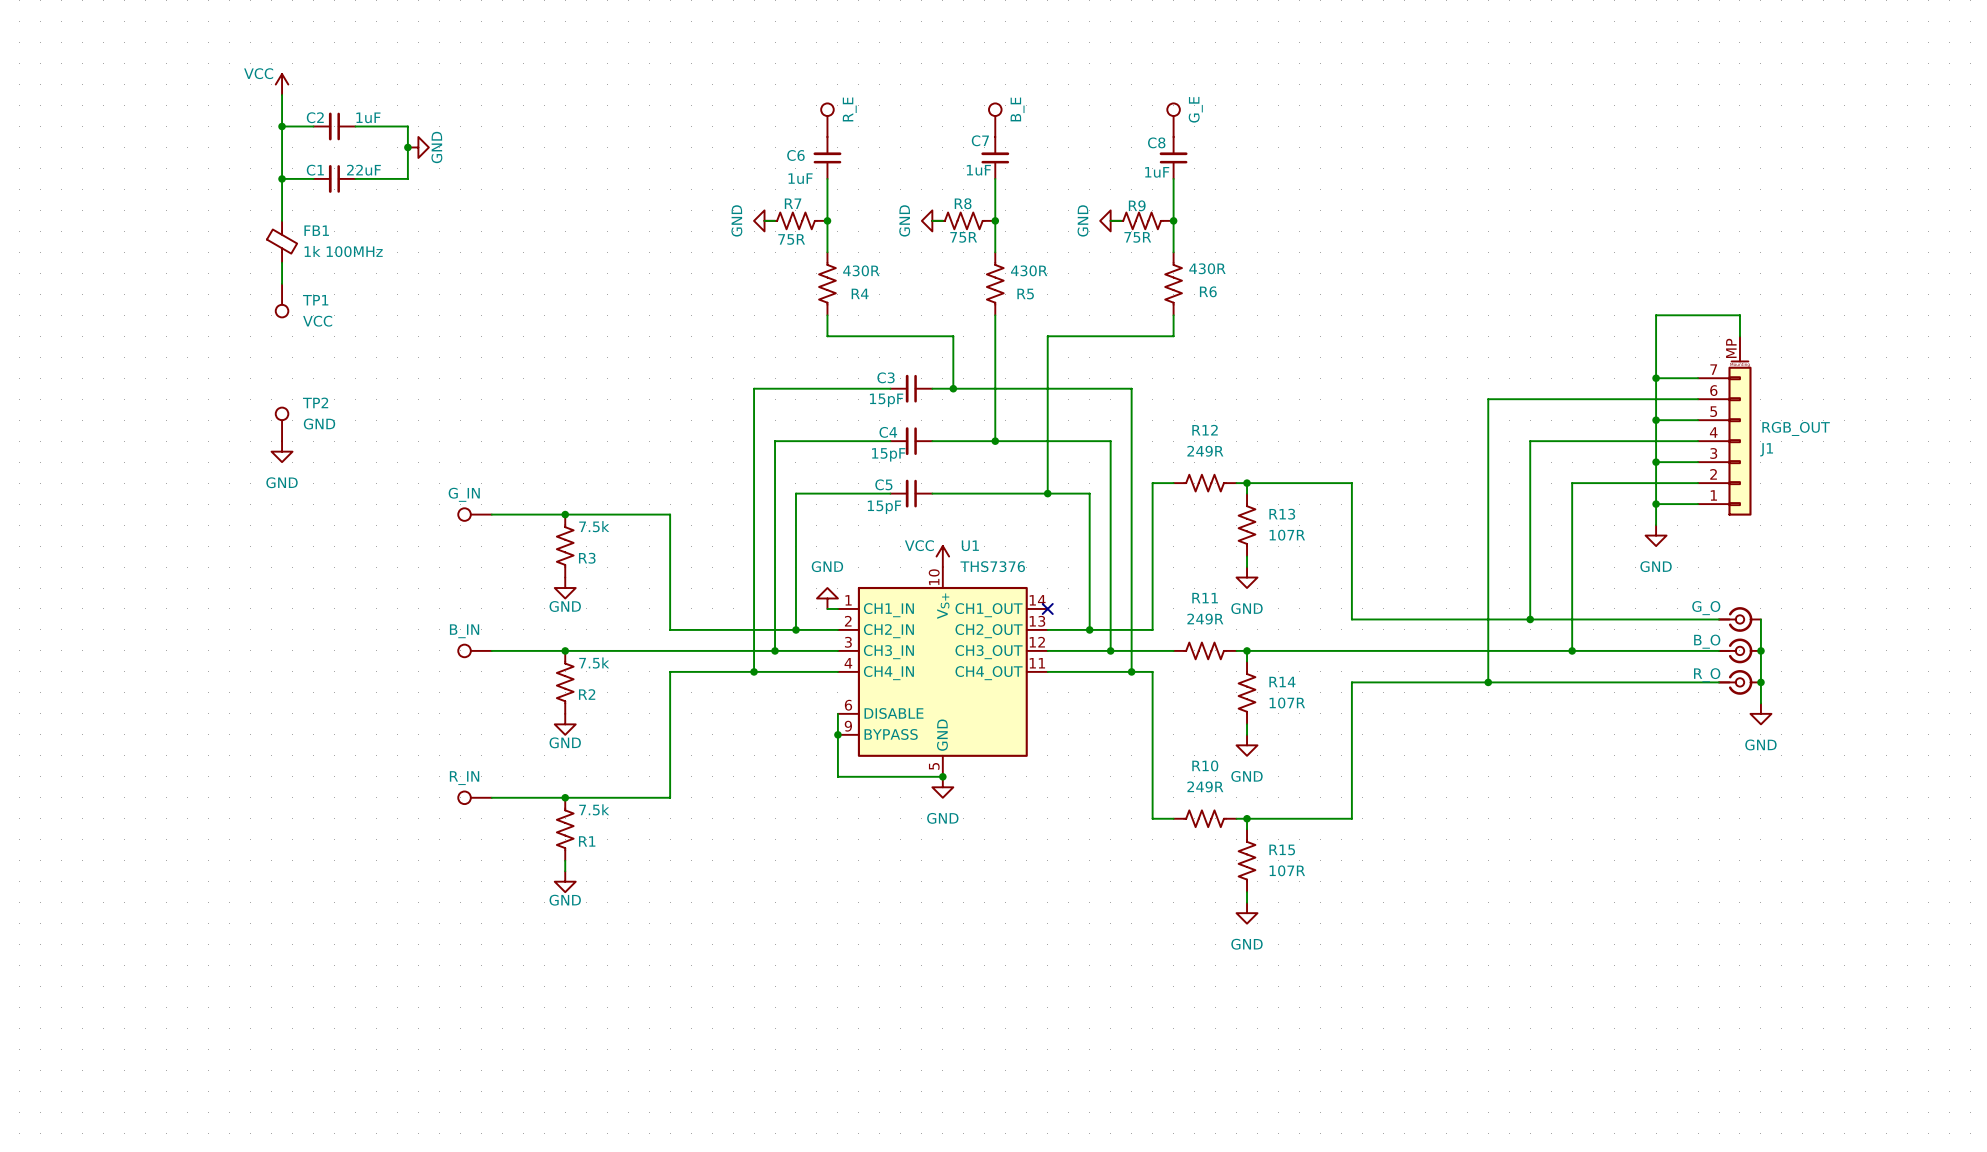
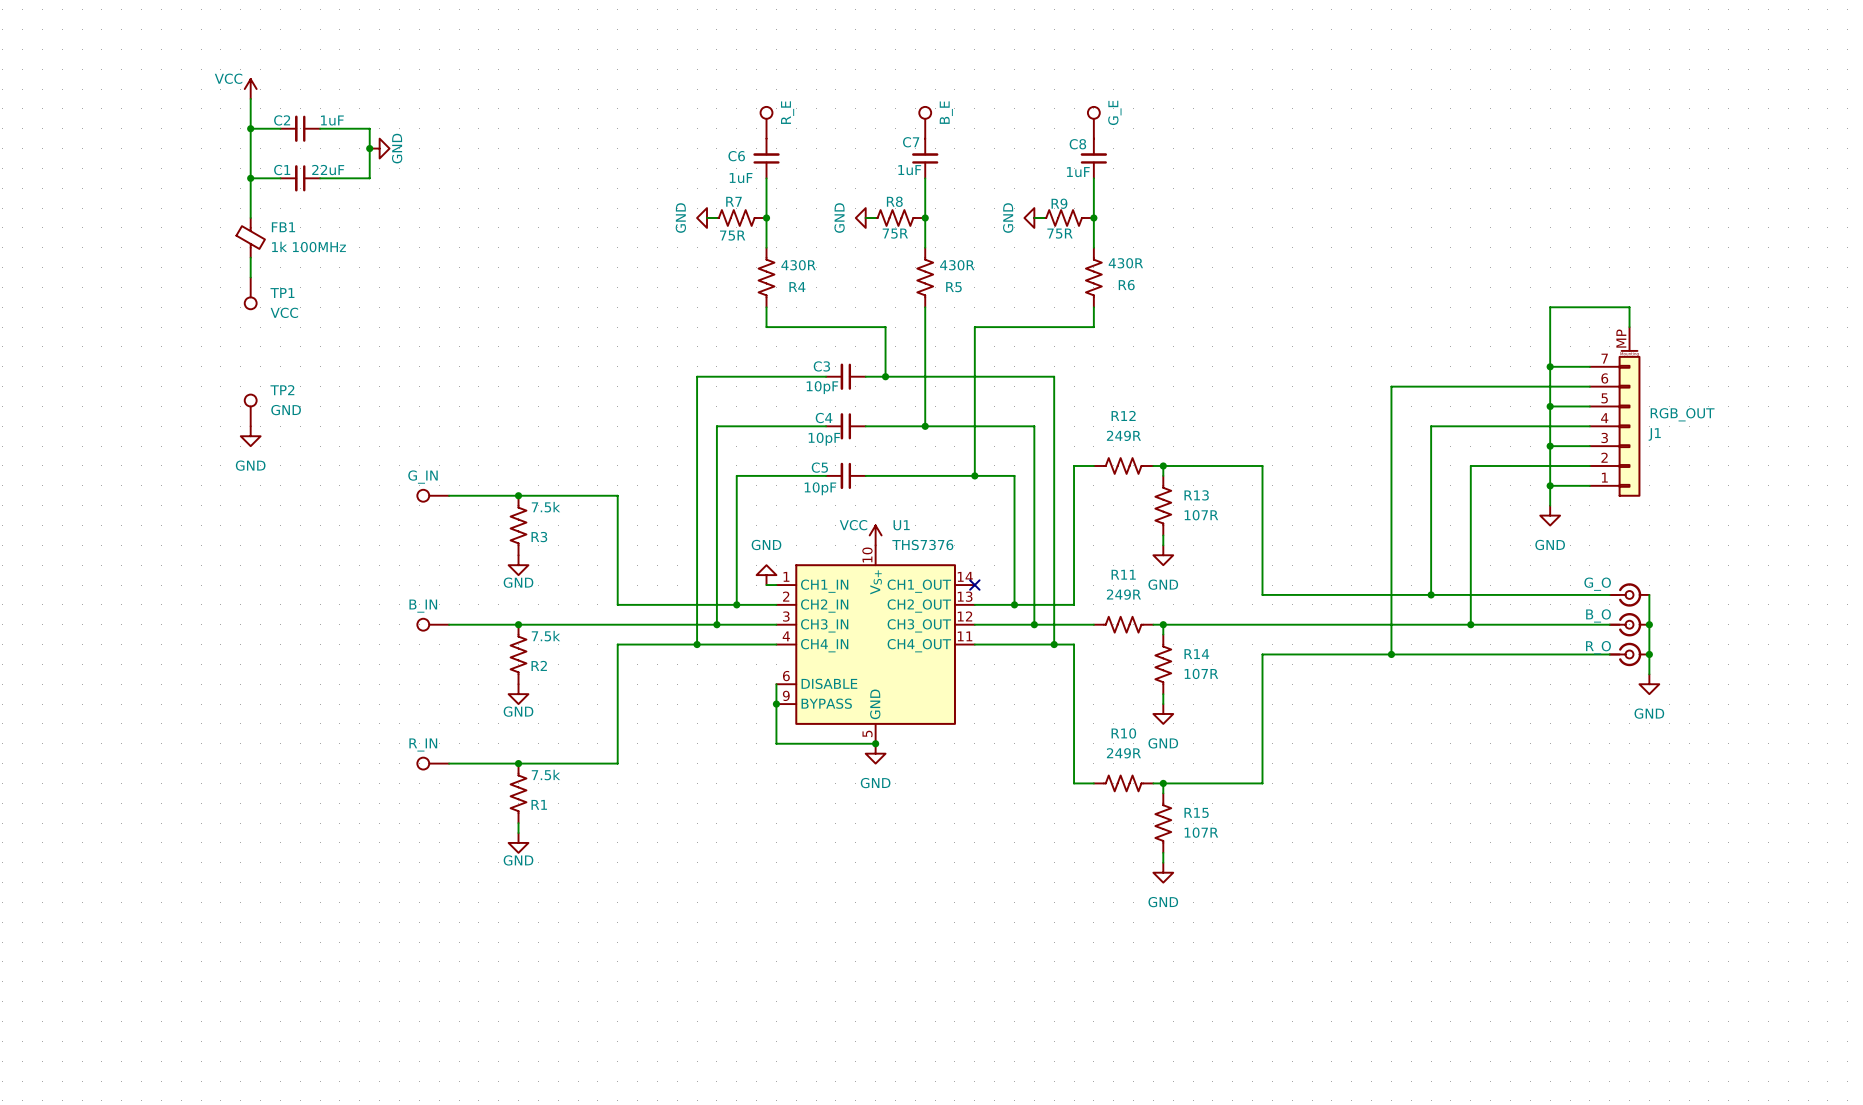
C3 value: 15pF (886, 400) -> 10pF (822, 387)
C4 value: 15pF (888, 454) -> 10pF (824, 439)
C5 value: 15pF (884, 507) -> 10pF (820, 488)

